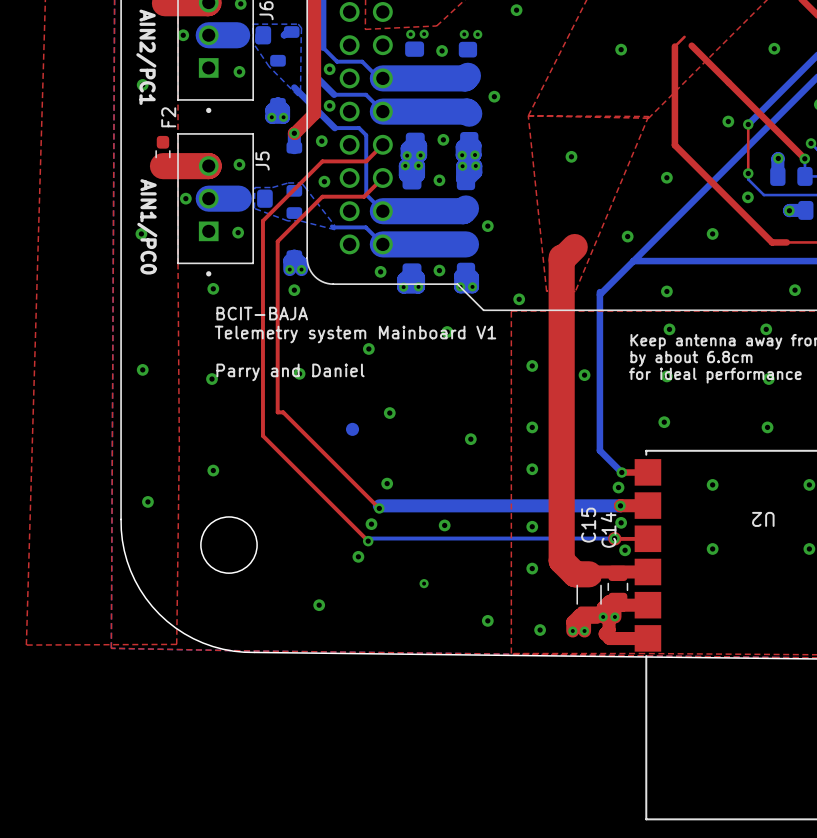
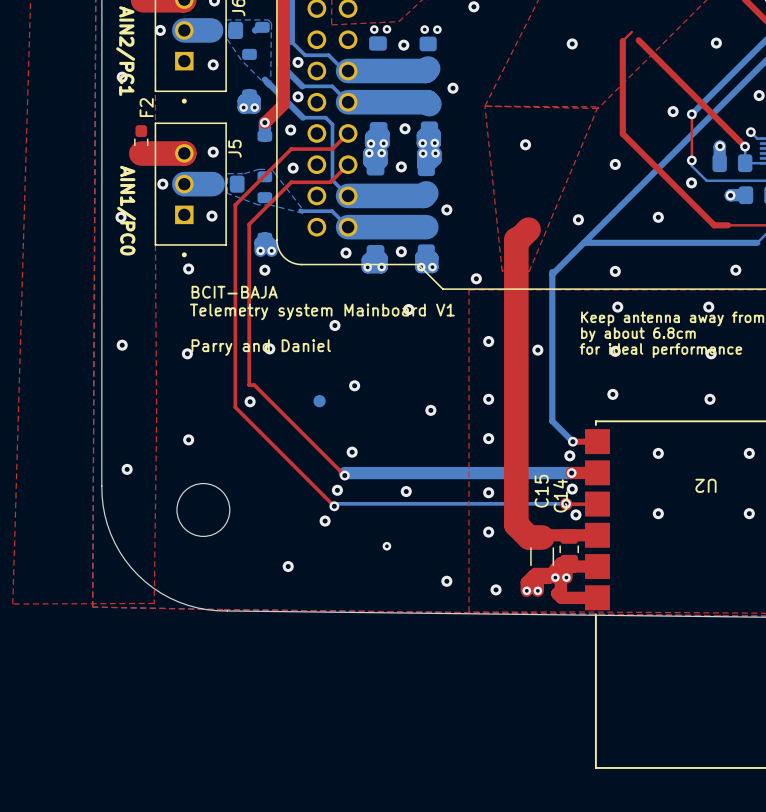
via: none -> (250, 401)

